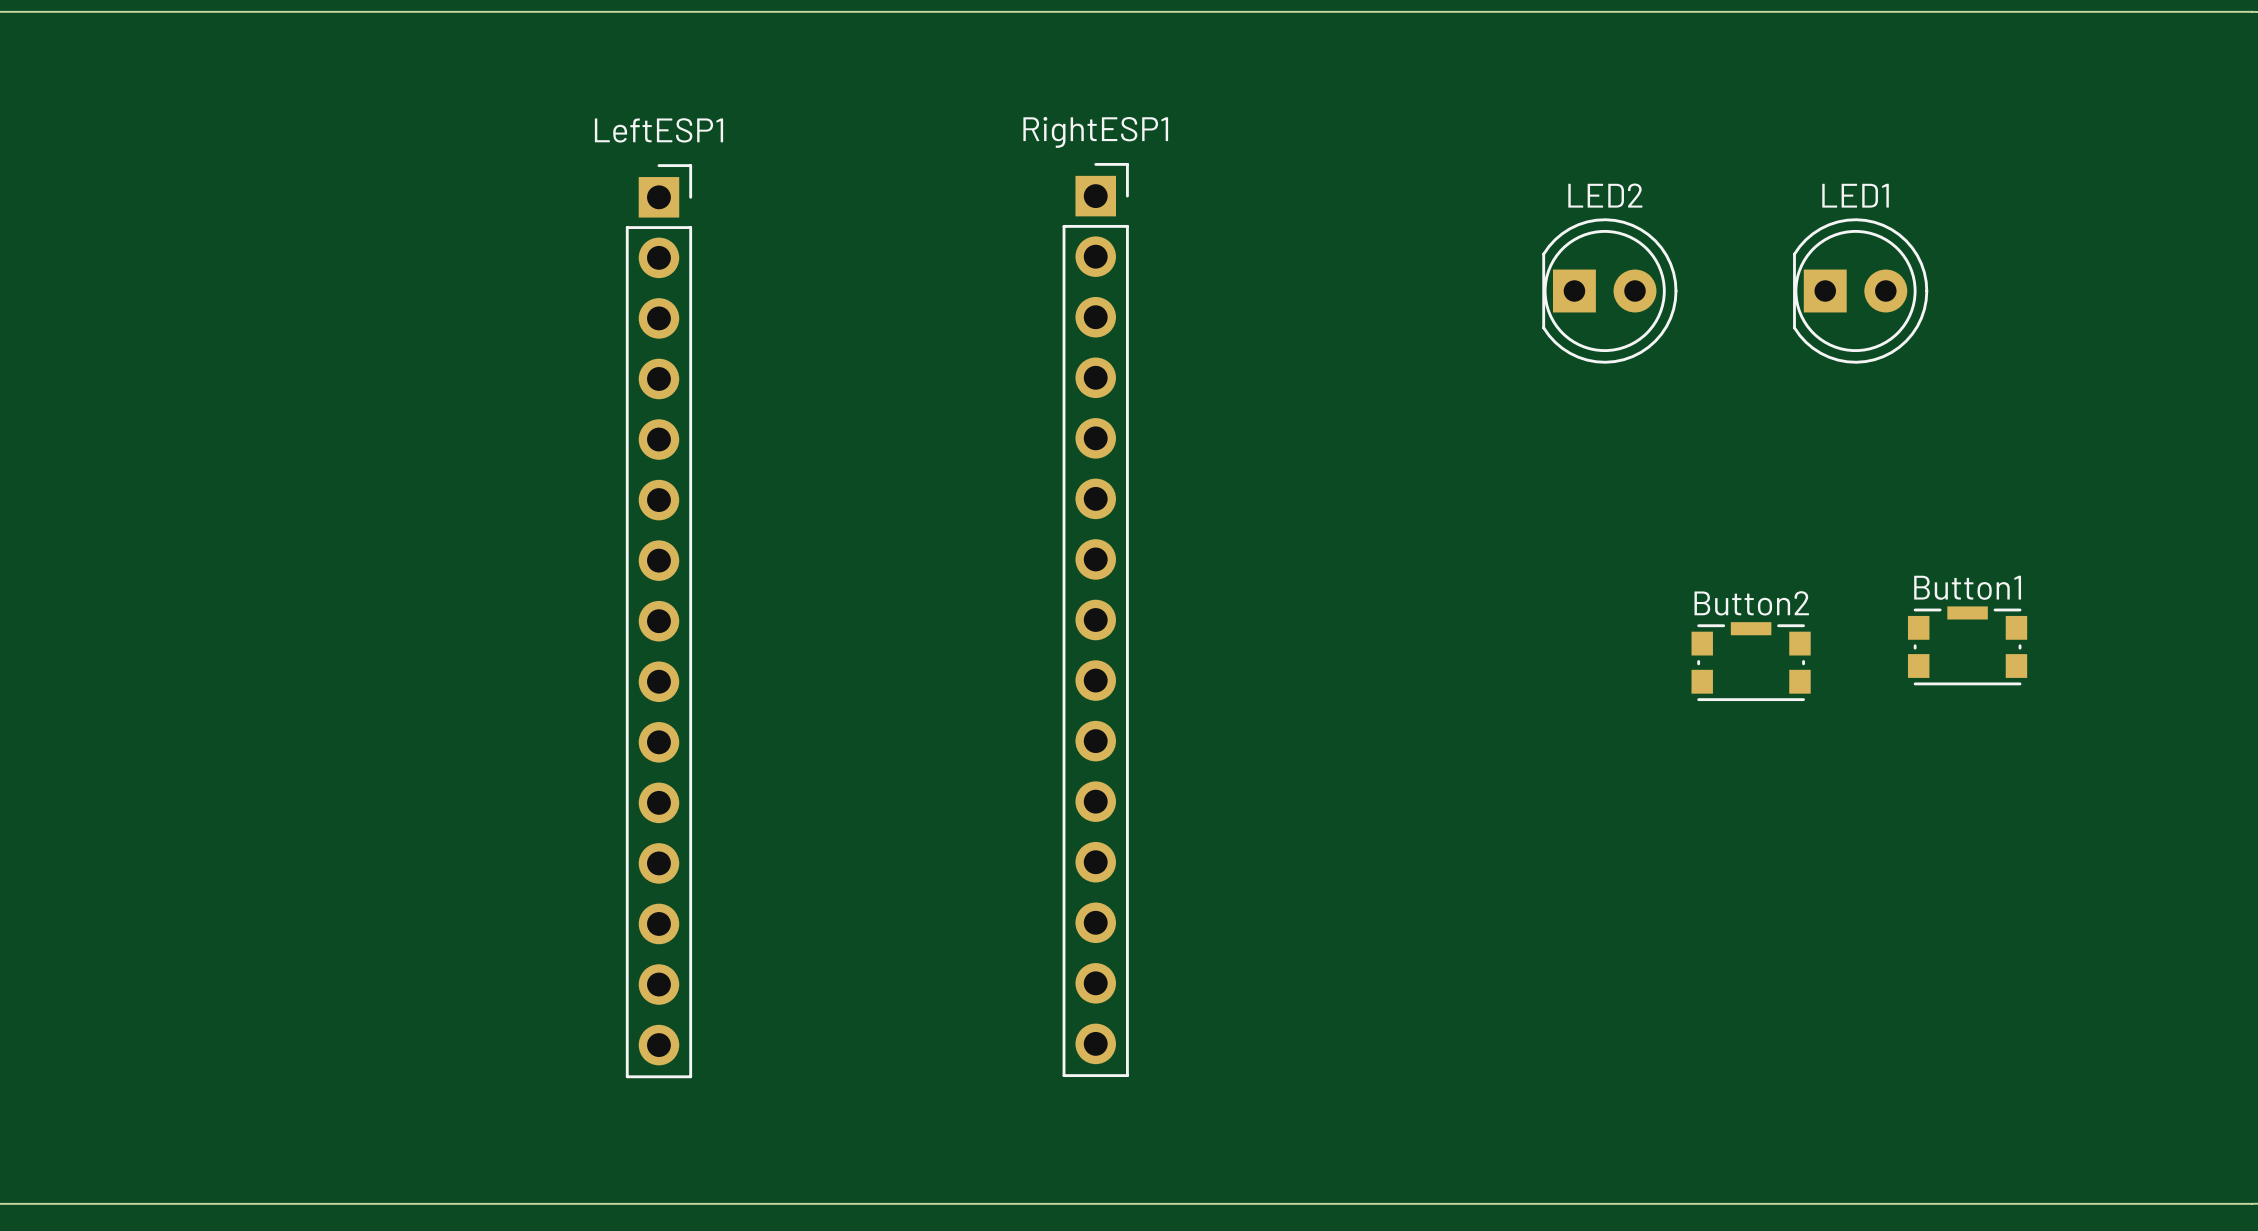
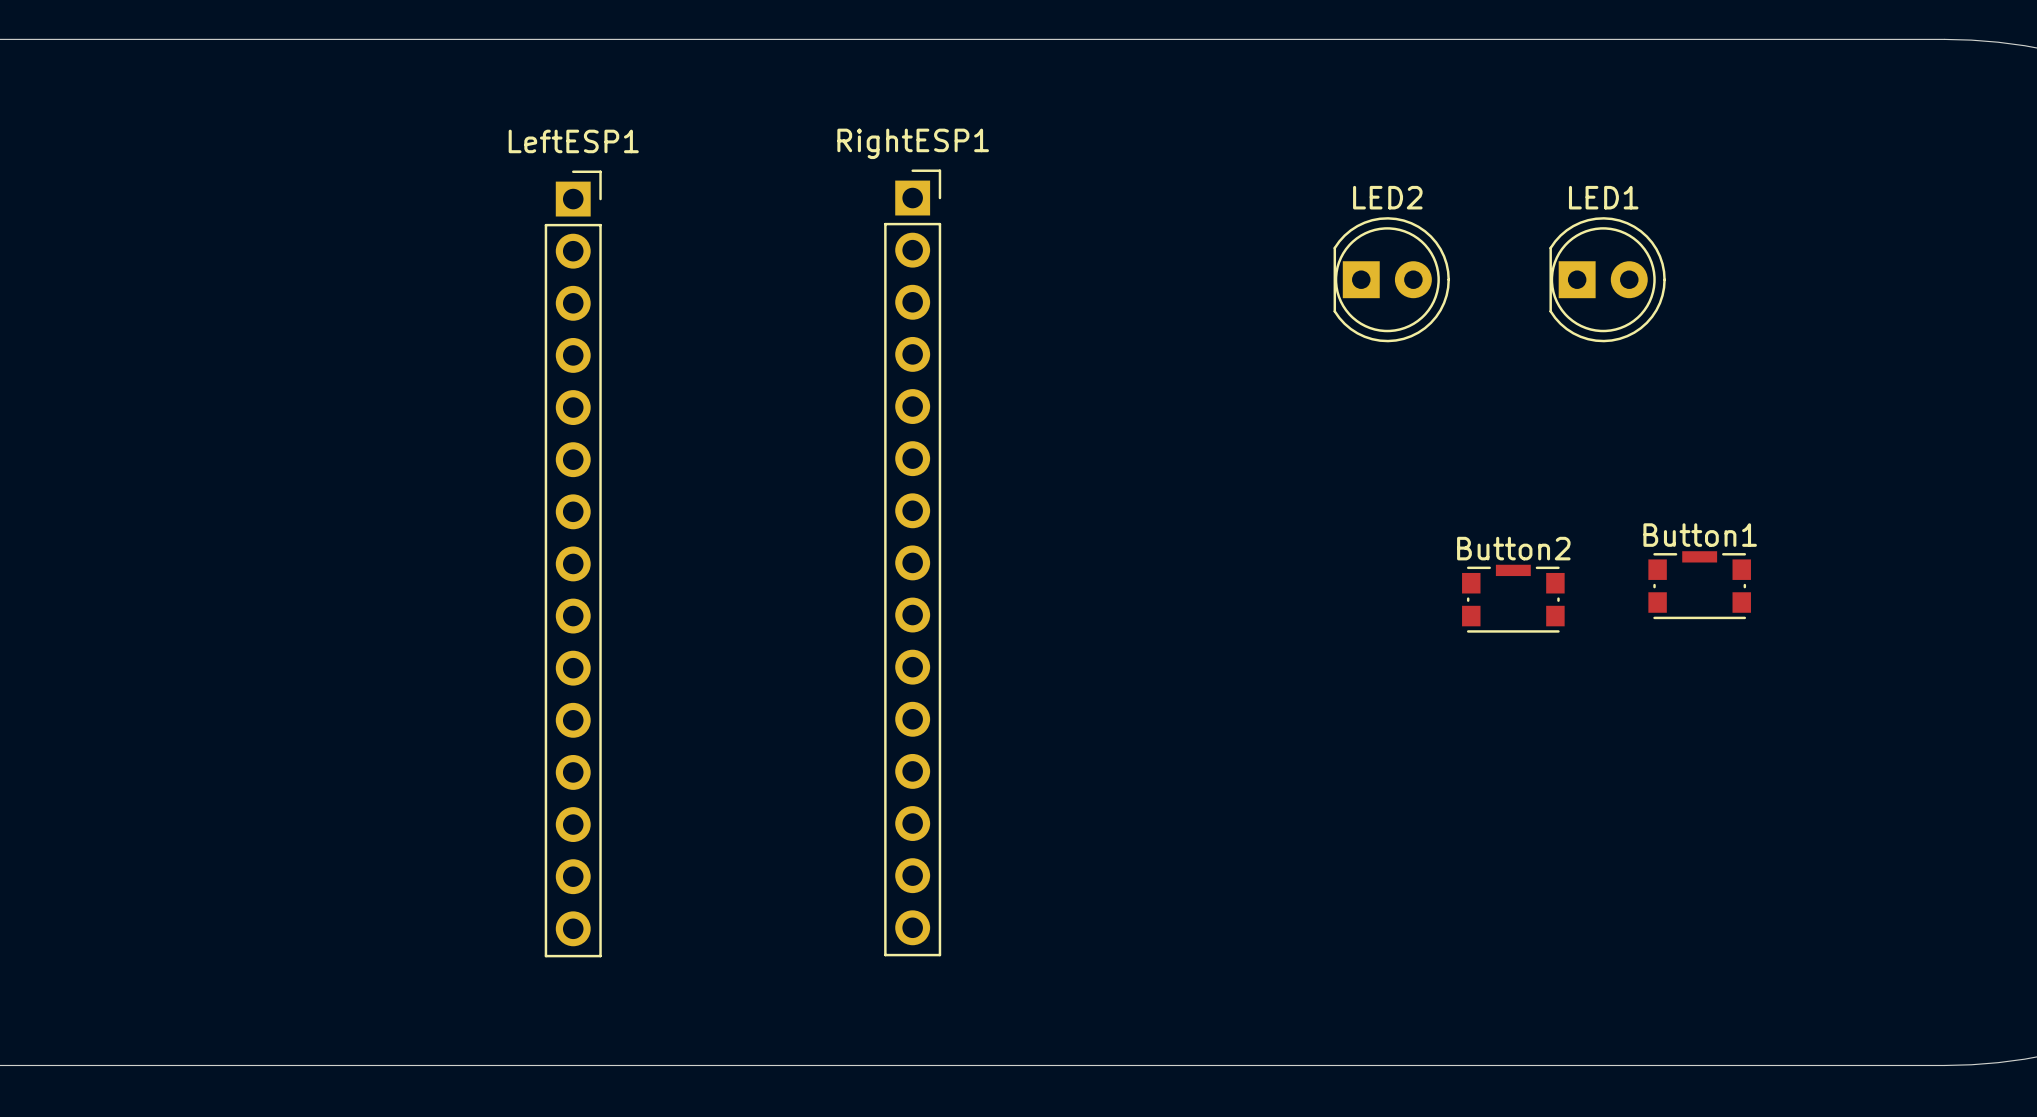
RightESP1 position: (1095, 620) -> (912, 562)

